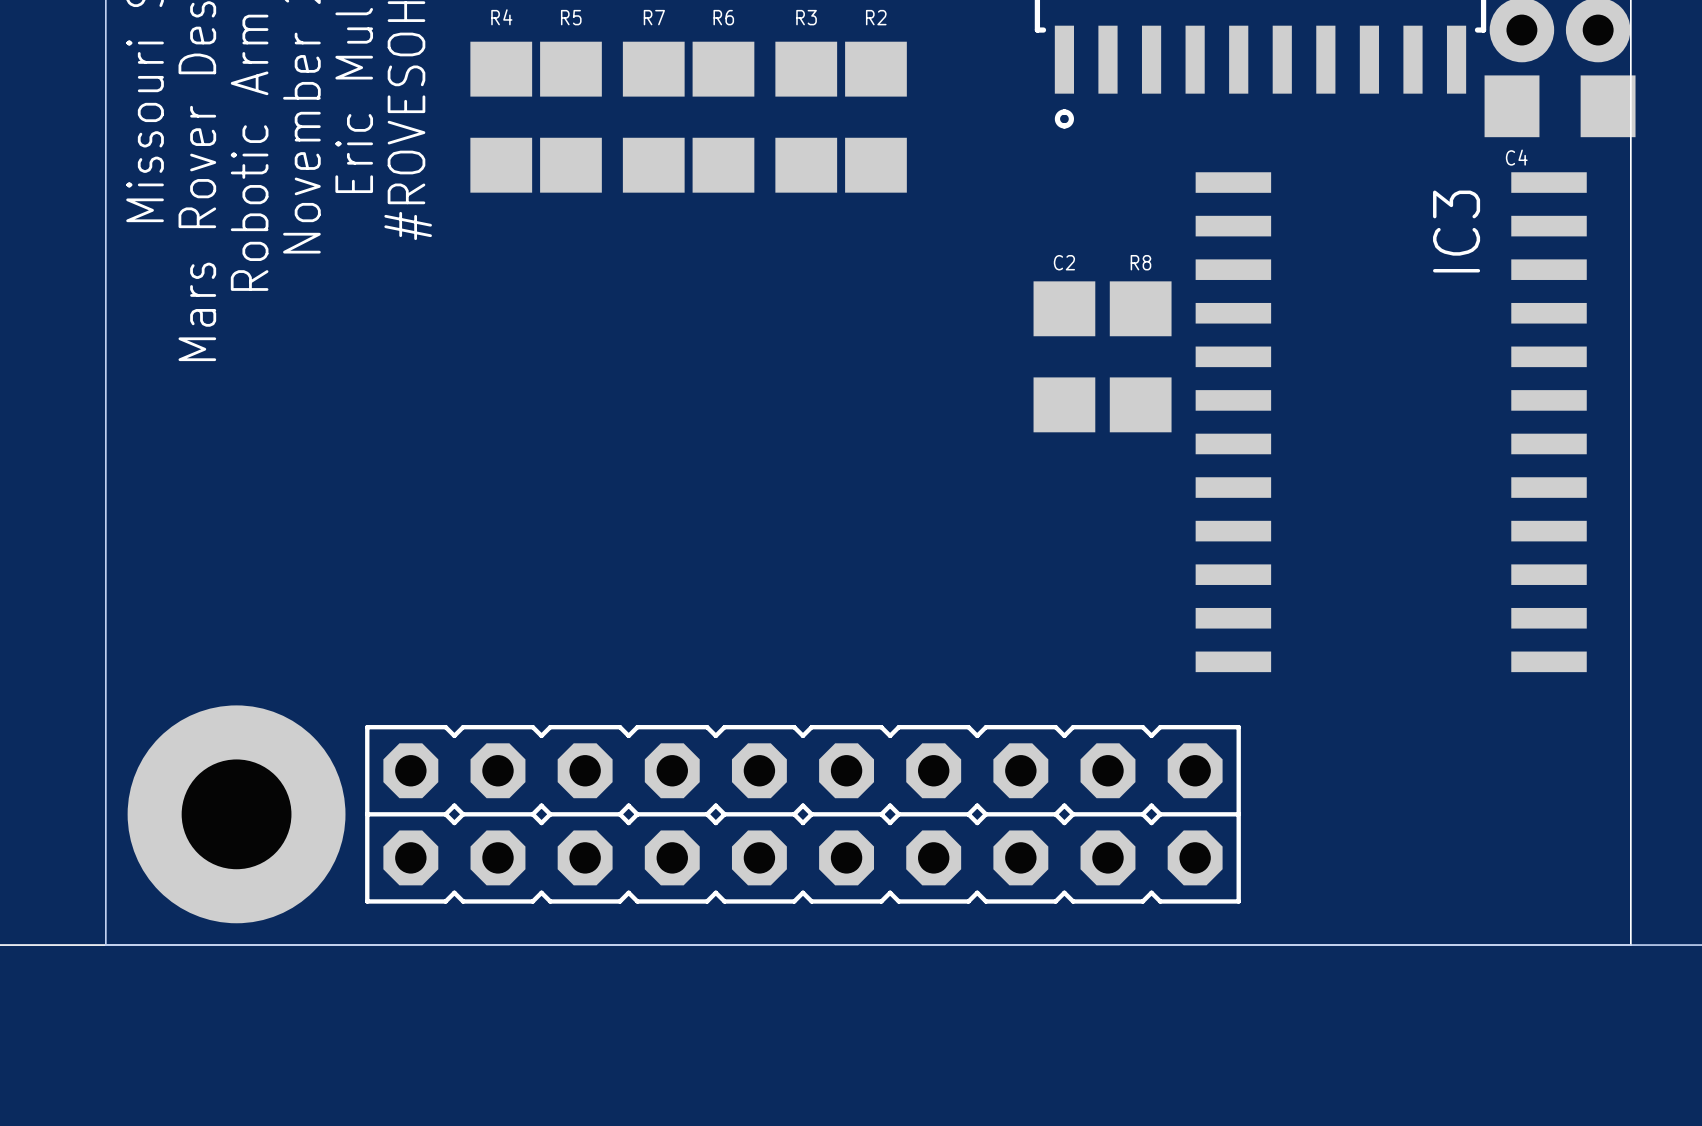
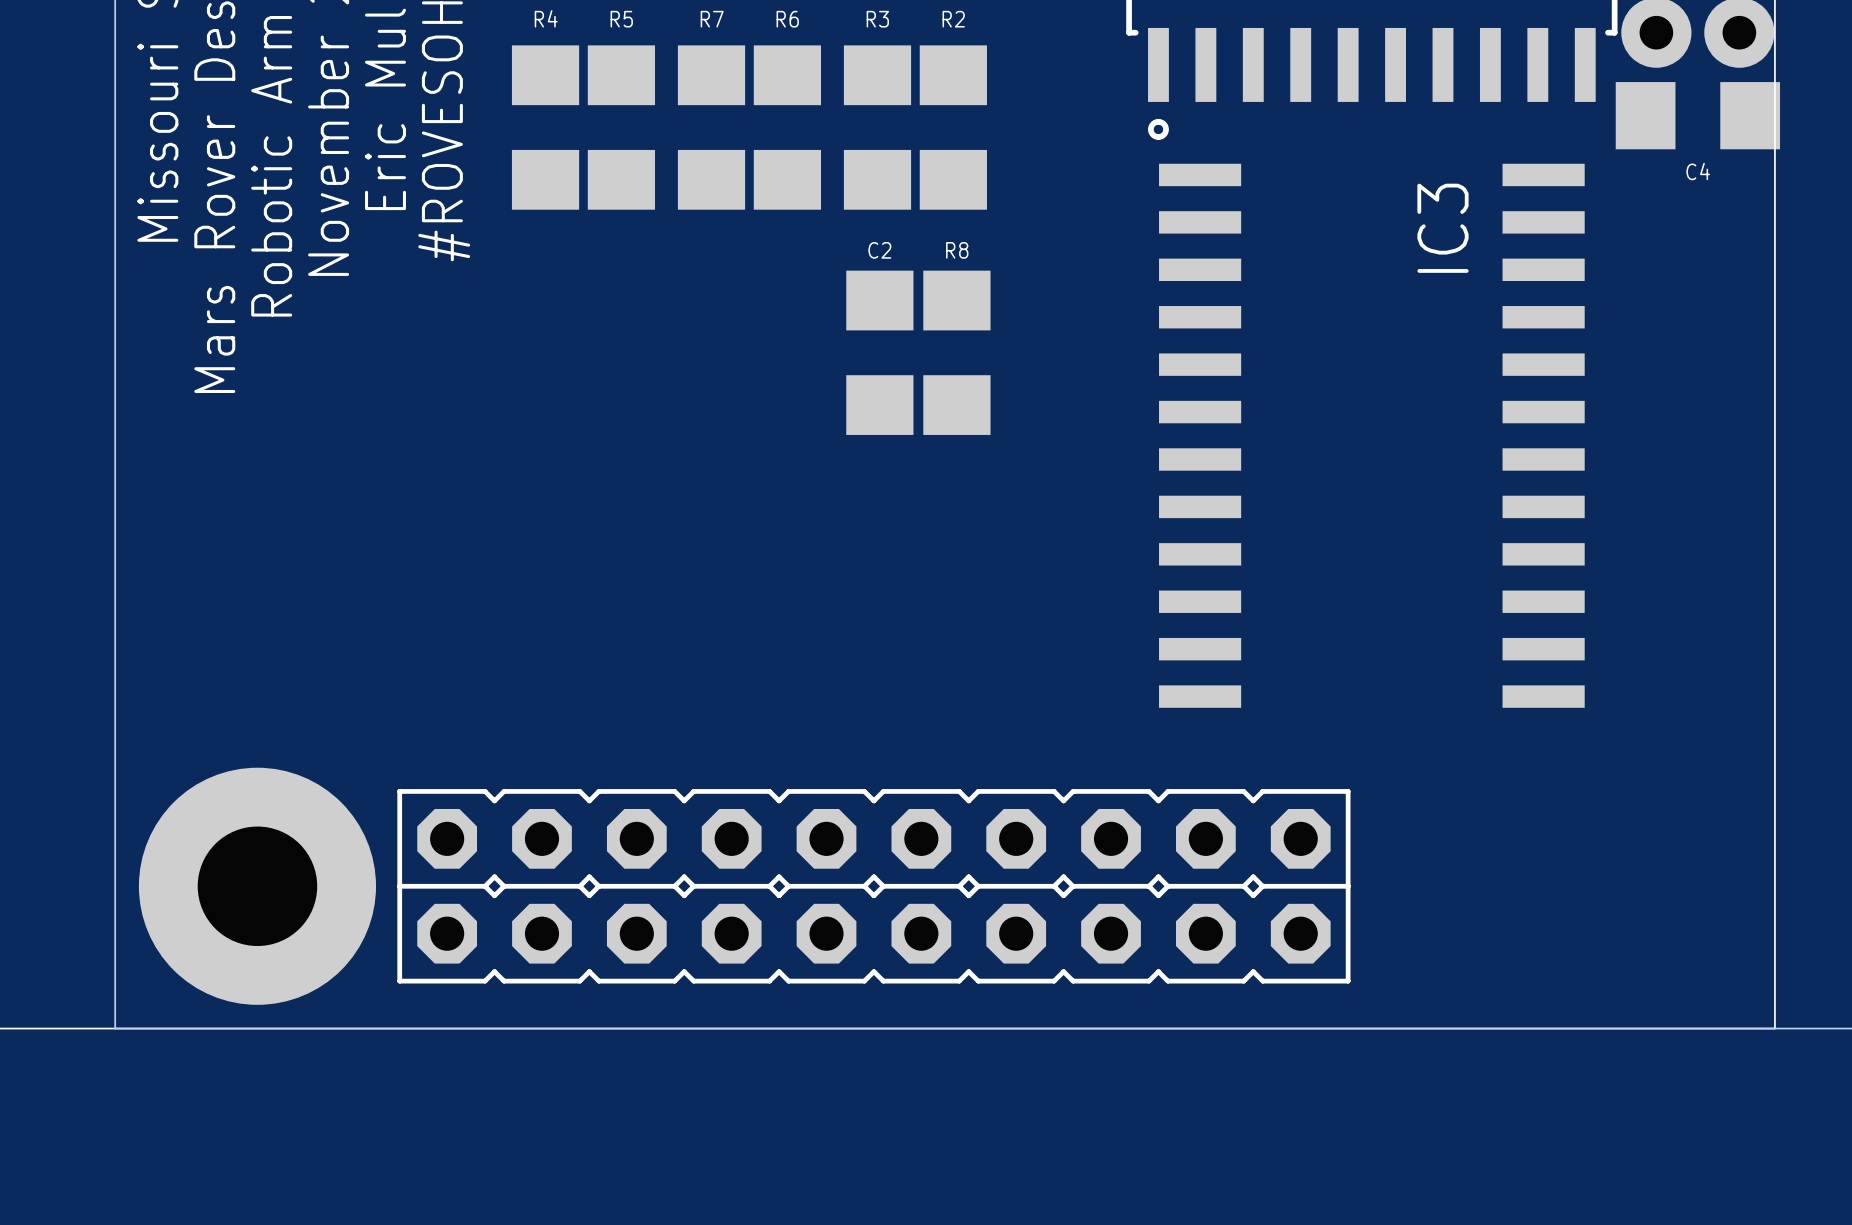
C4 name position: C4 (1516, 157) -> C4 (1698, 171)
C2 position: (1064, 356) -> (879, 352)
R8 position: (1140, 356) -> (956, 352)
IC3 position: (1391, 422) -> (1371, 435)

